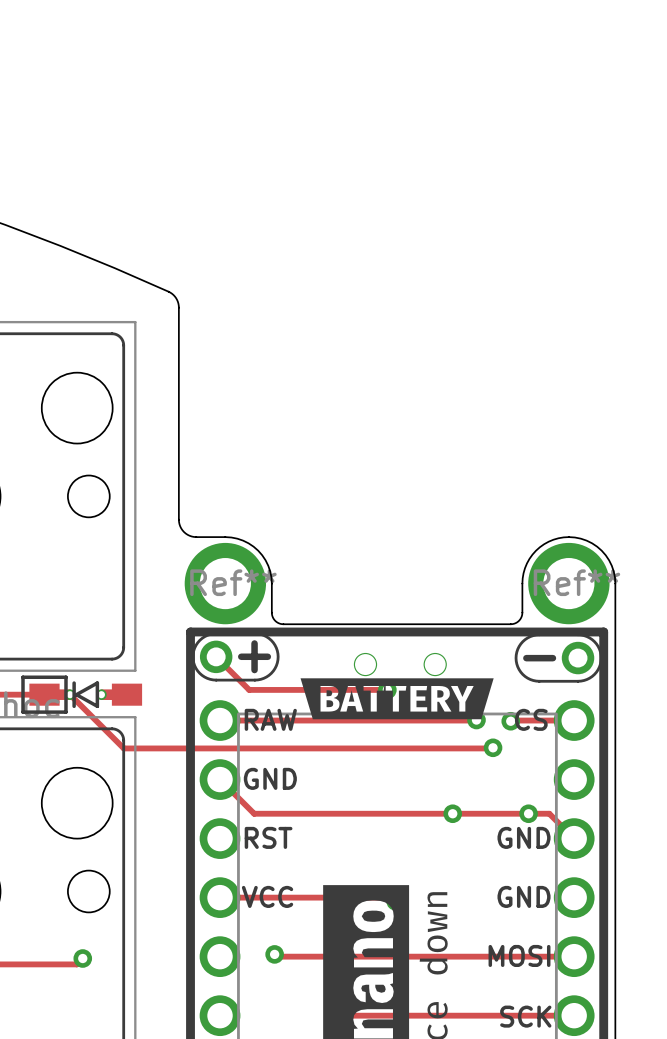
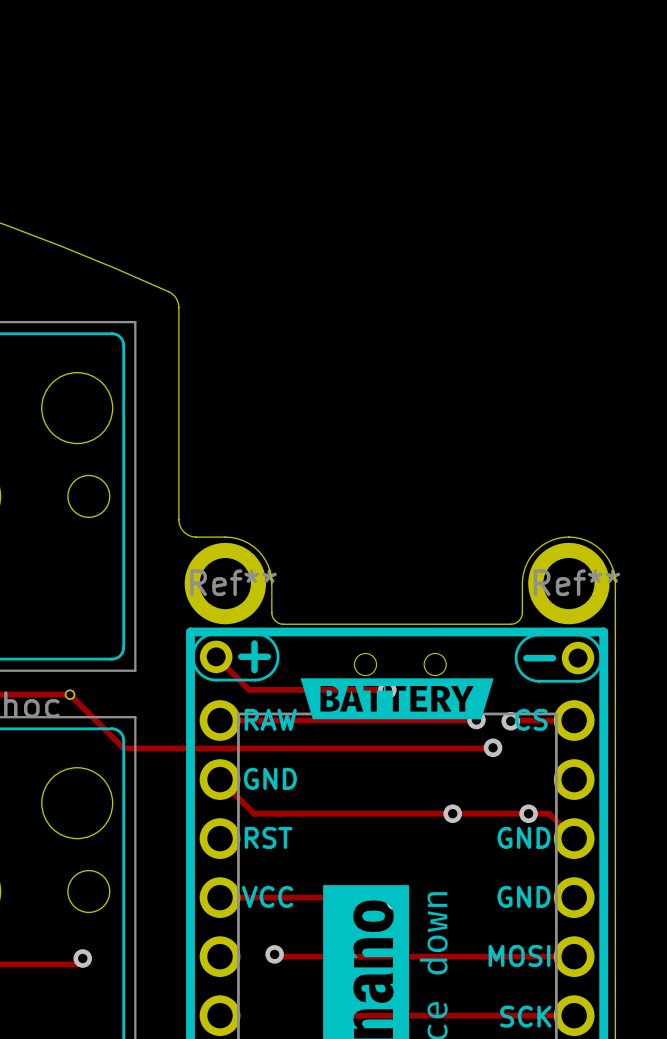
part footprint: [21, 675, 143, 714] -> [64, 689, 76, 700]
track: none -> (44, 694) (70, 694)

